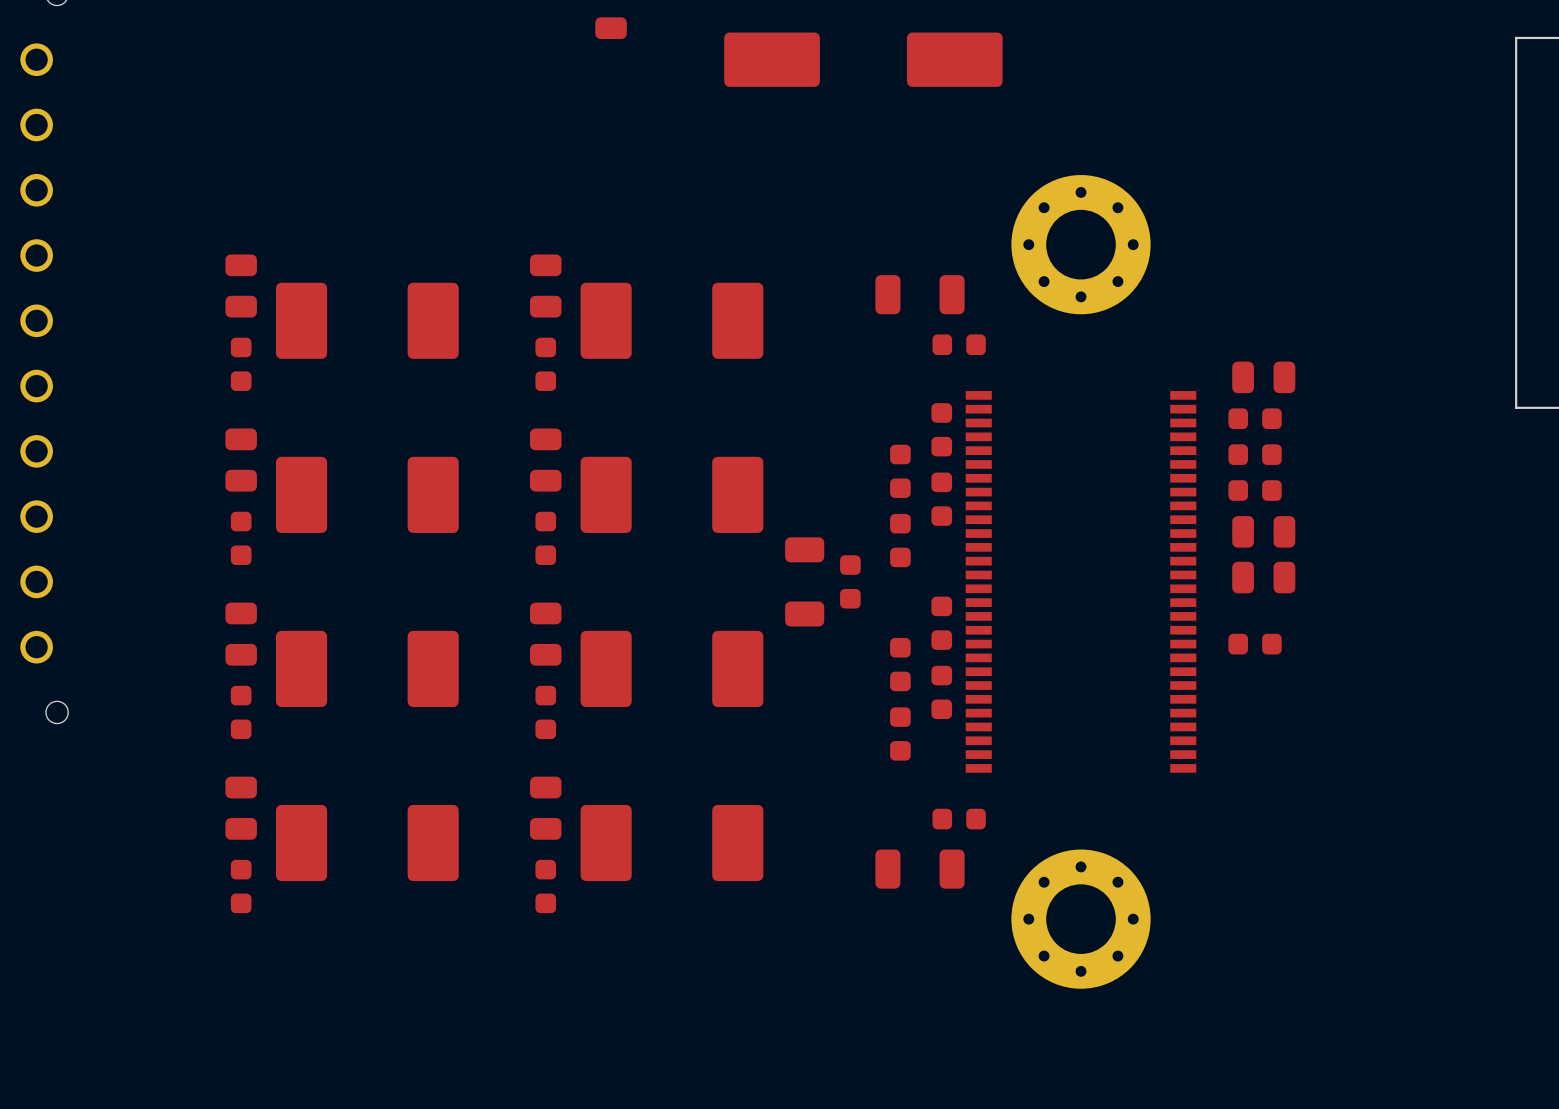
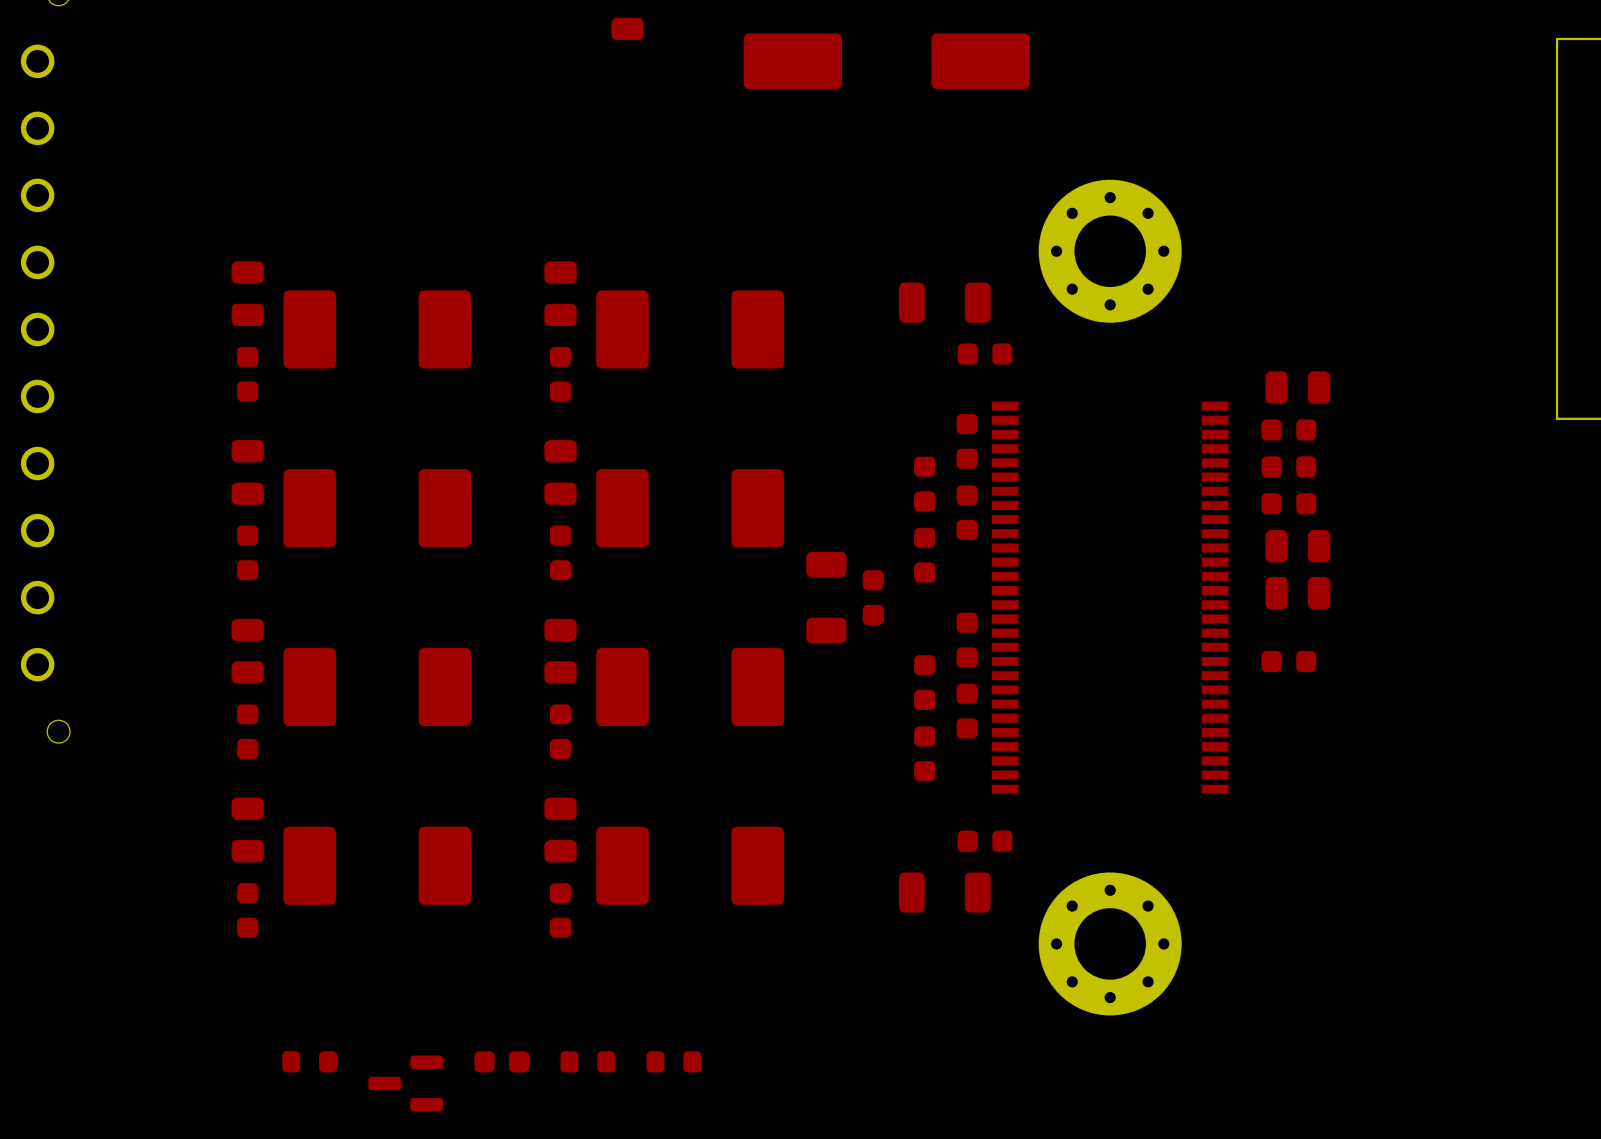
part: none -> (309, 1061)
part: none -> (501, 1061)
part: none -> (587, 1061)
part: none -> (673, 1061)
part: none -> (405, 1083)

